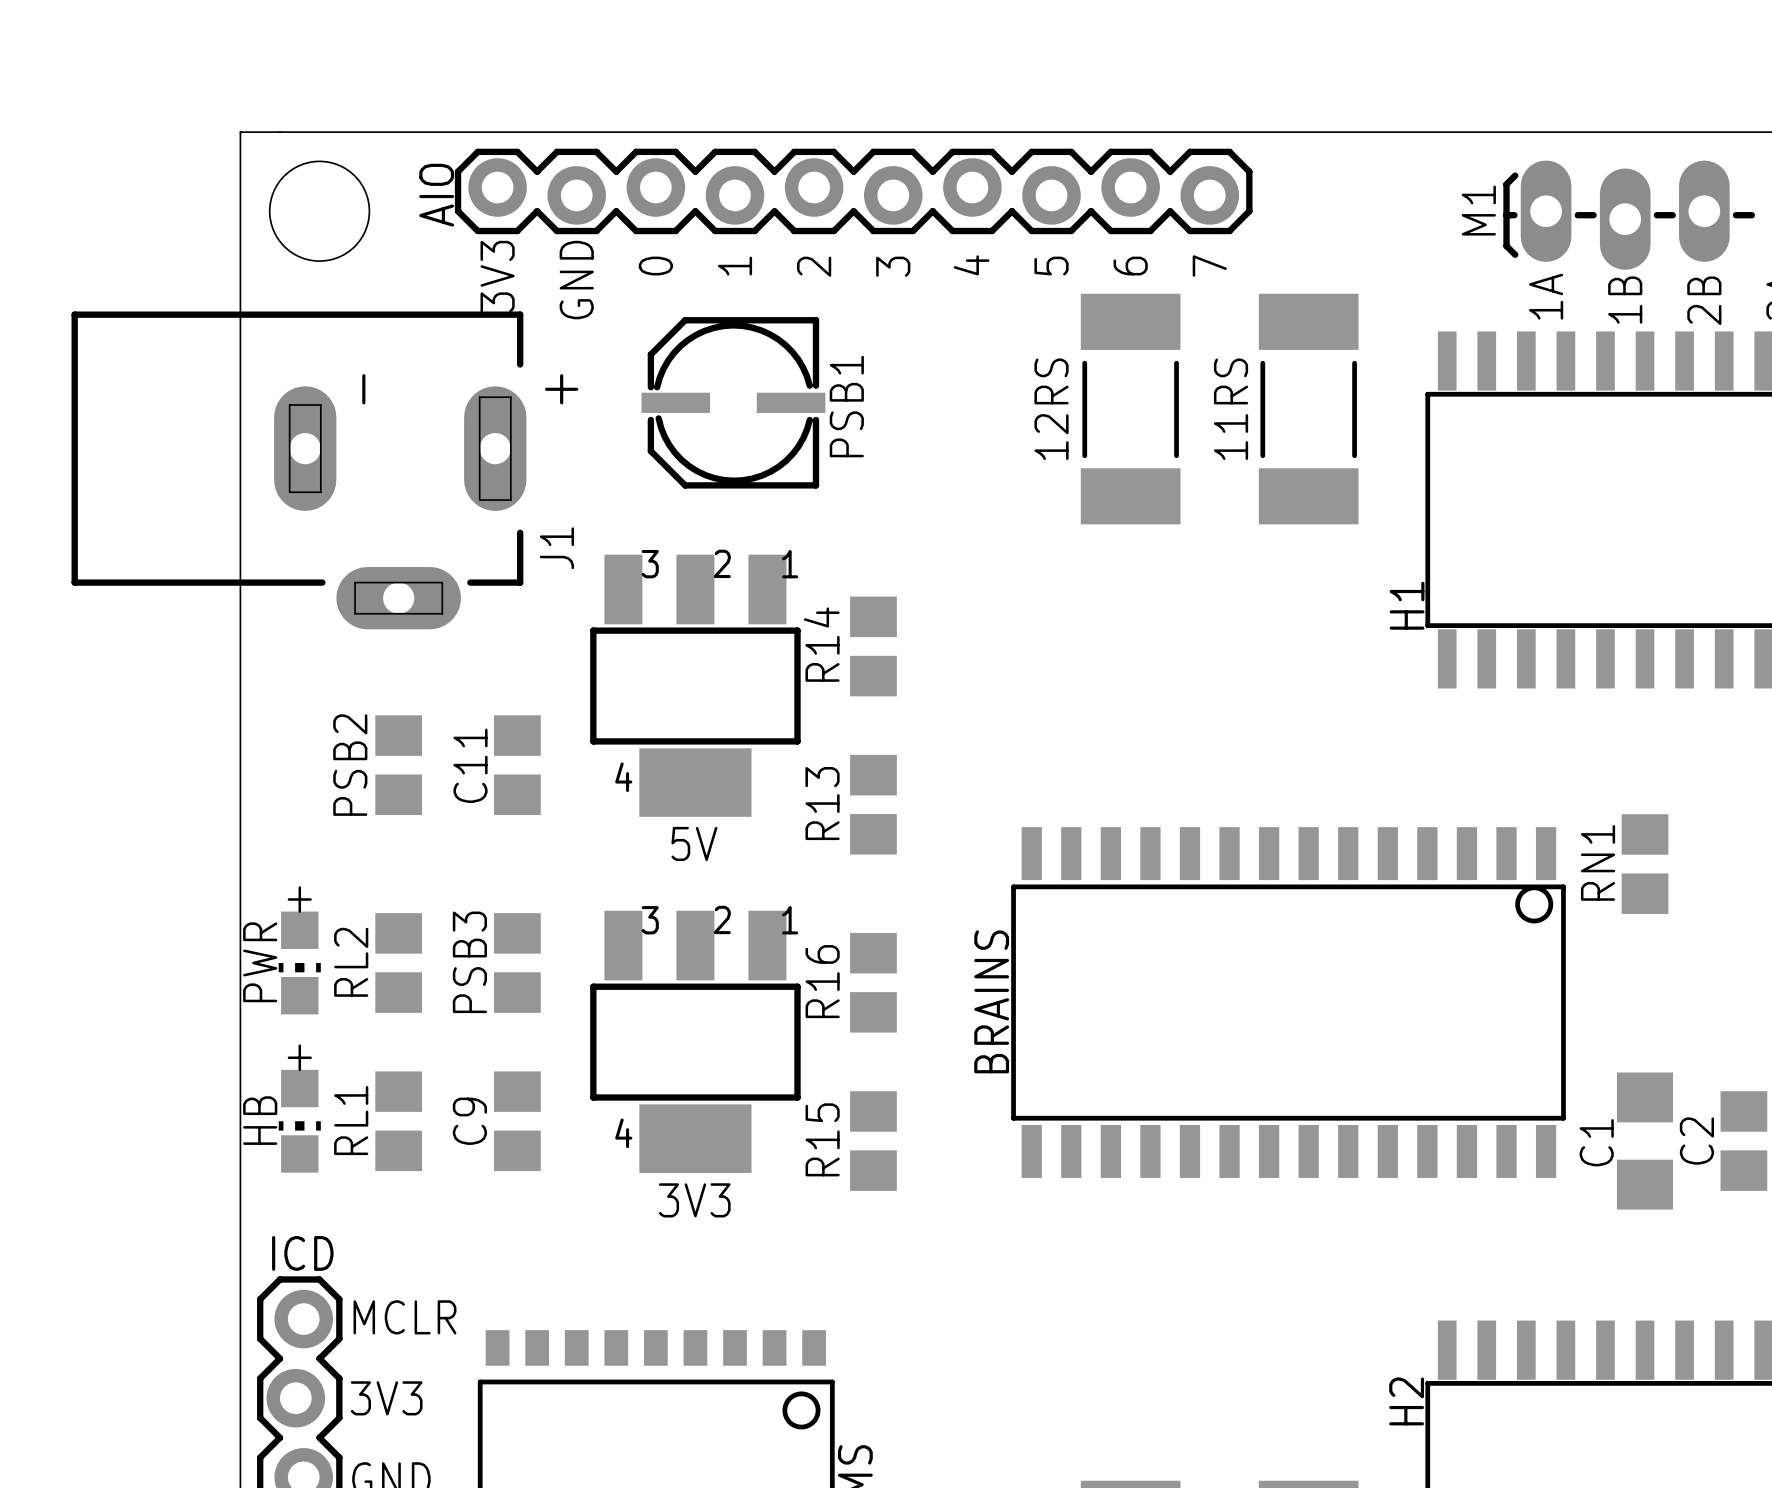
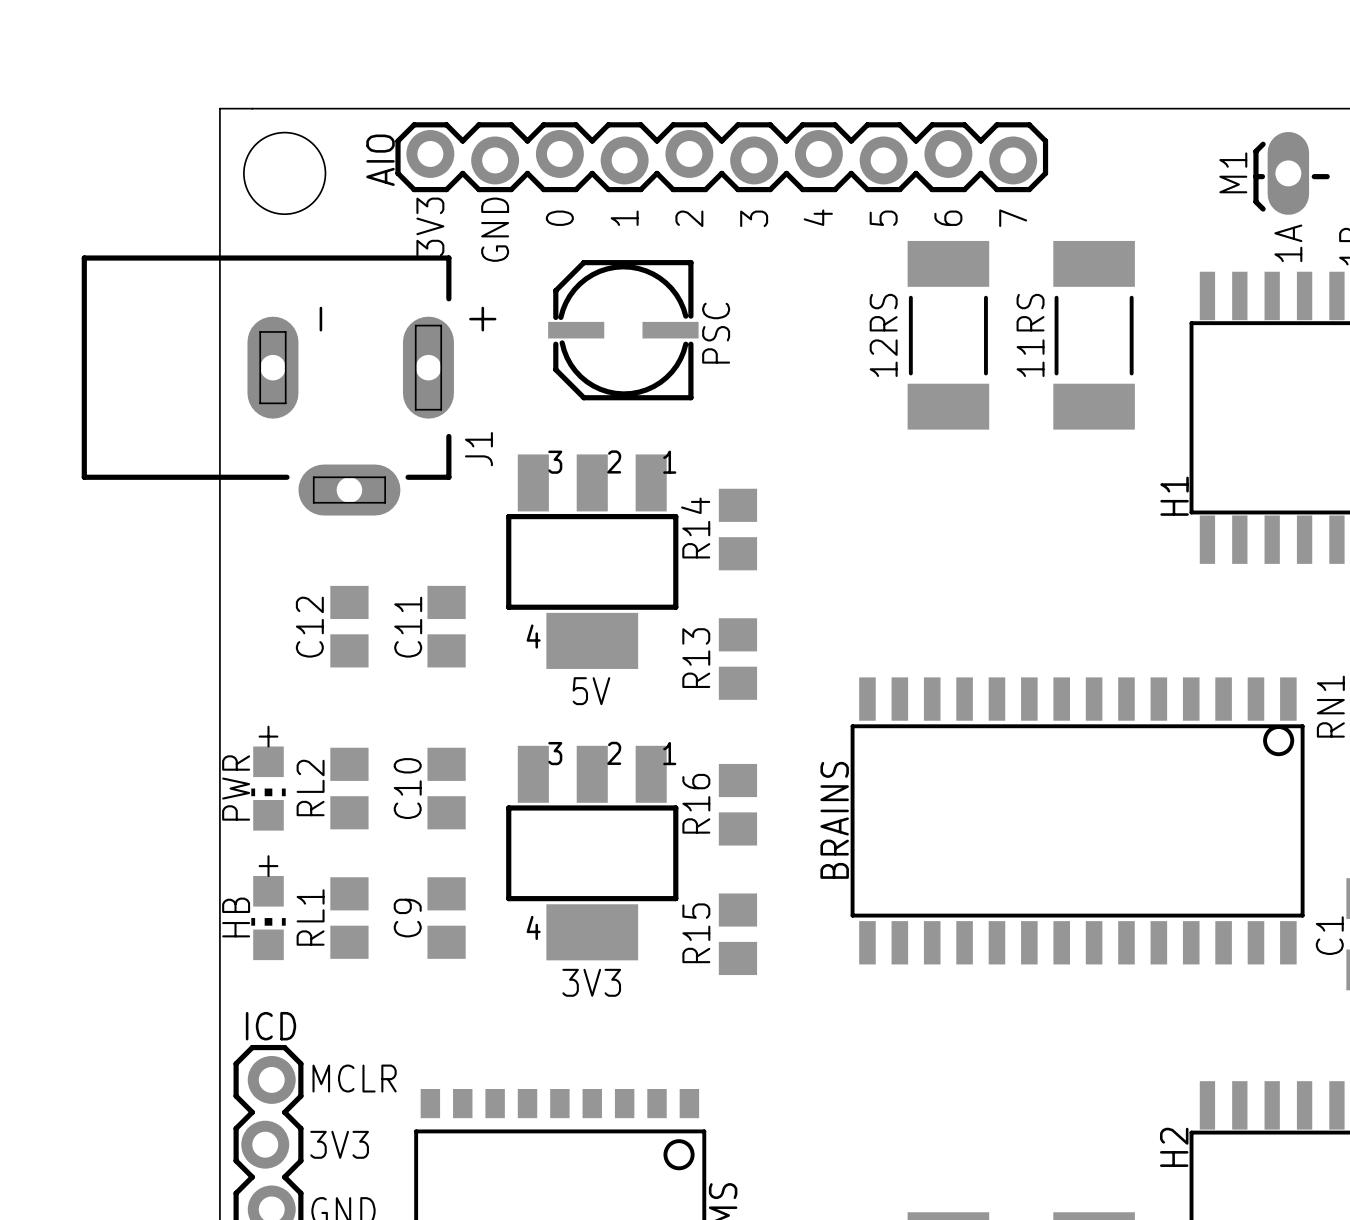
PSB1 name: PSB1 (846, 406) -> PSC (716, 333)
PSB2 name: PSB2 (350, 765) -> C12 (309, 627)
PSB3 name: PSB3 (469, 962) -> C10 (407, 788)

